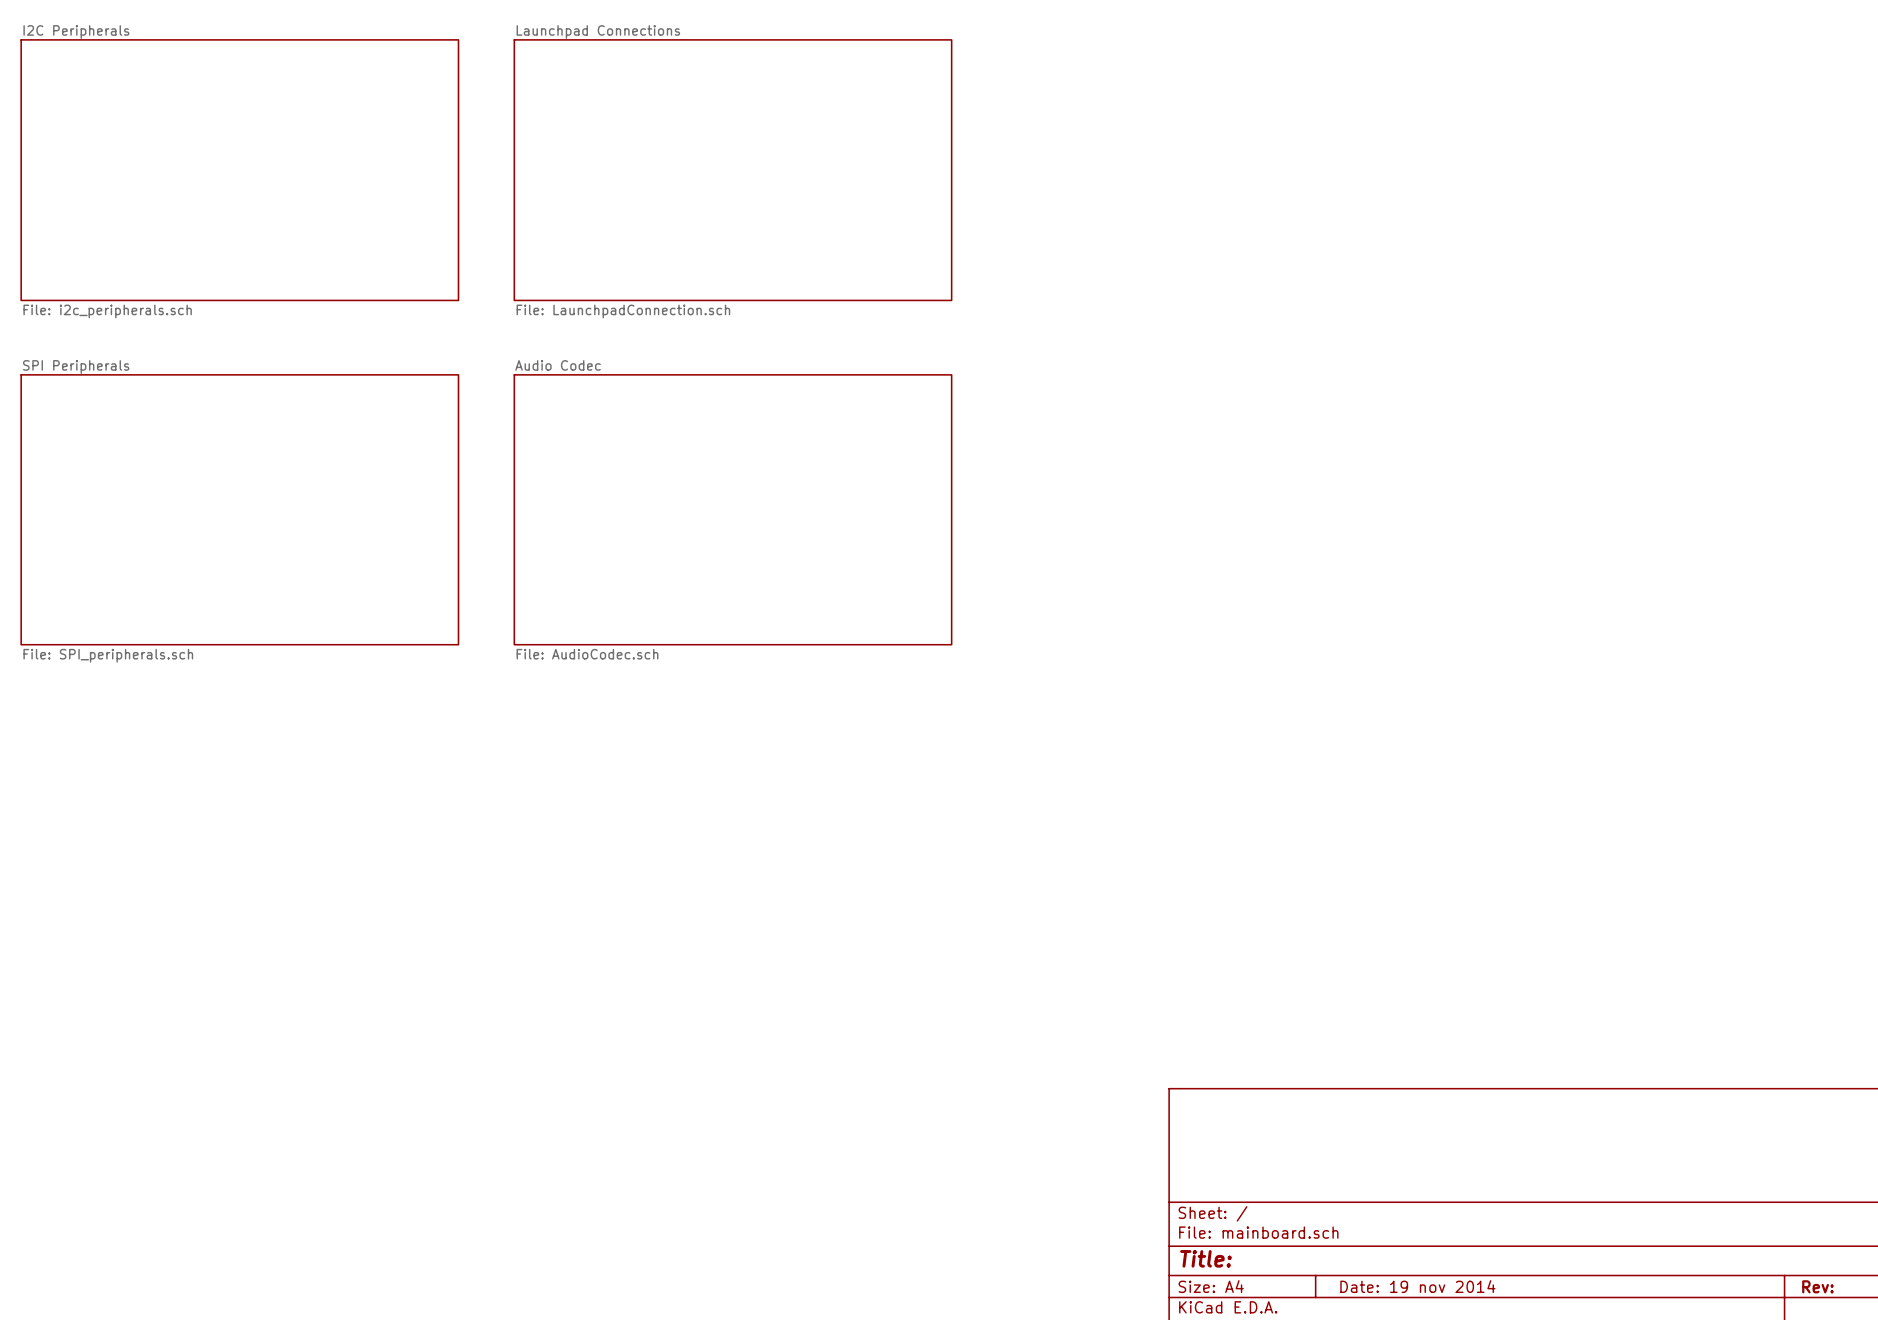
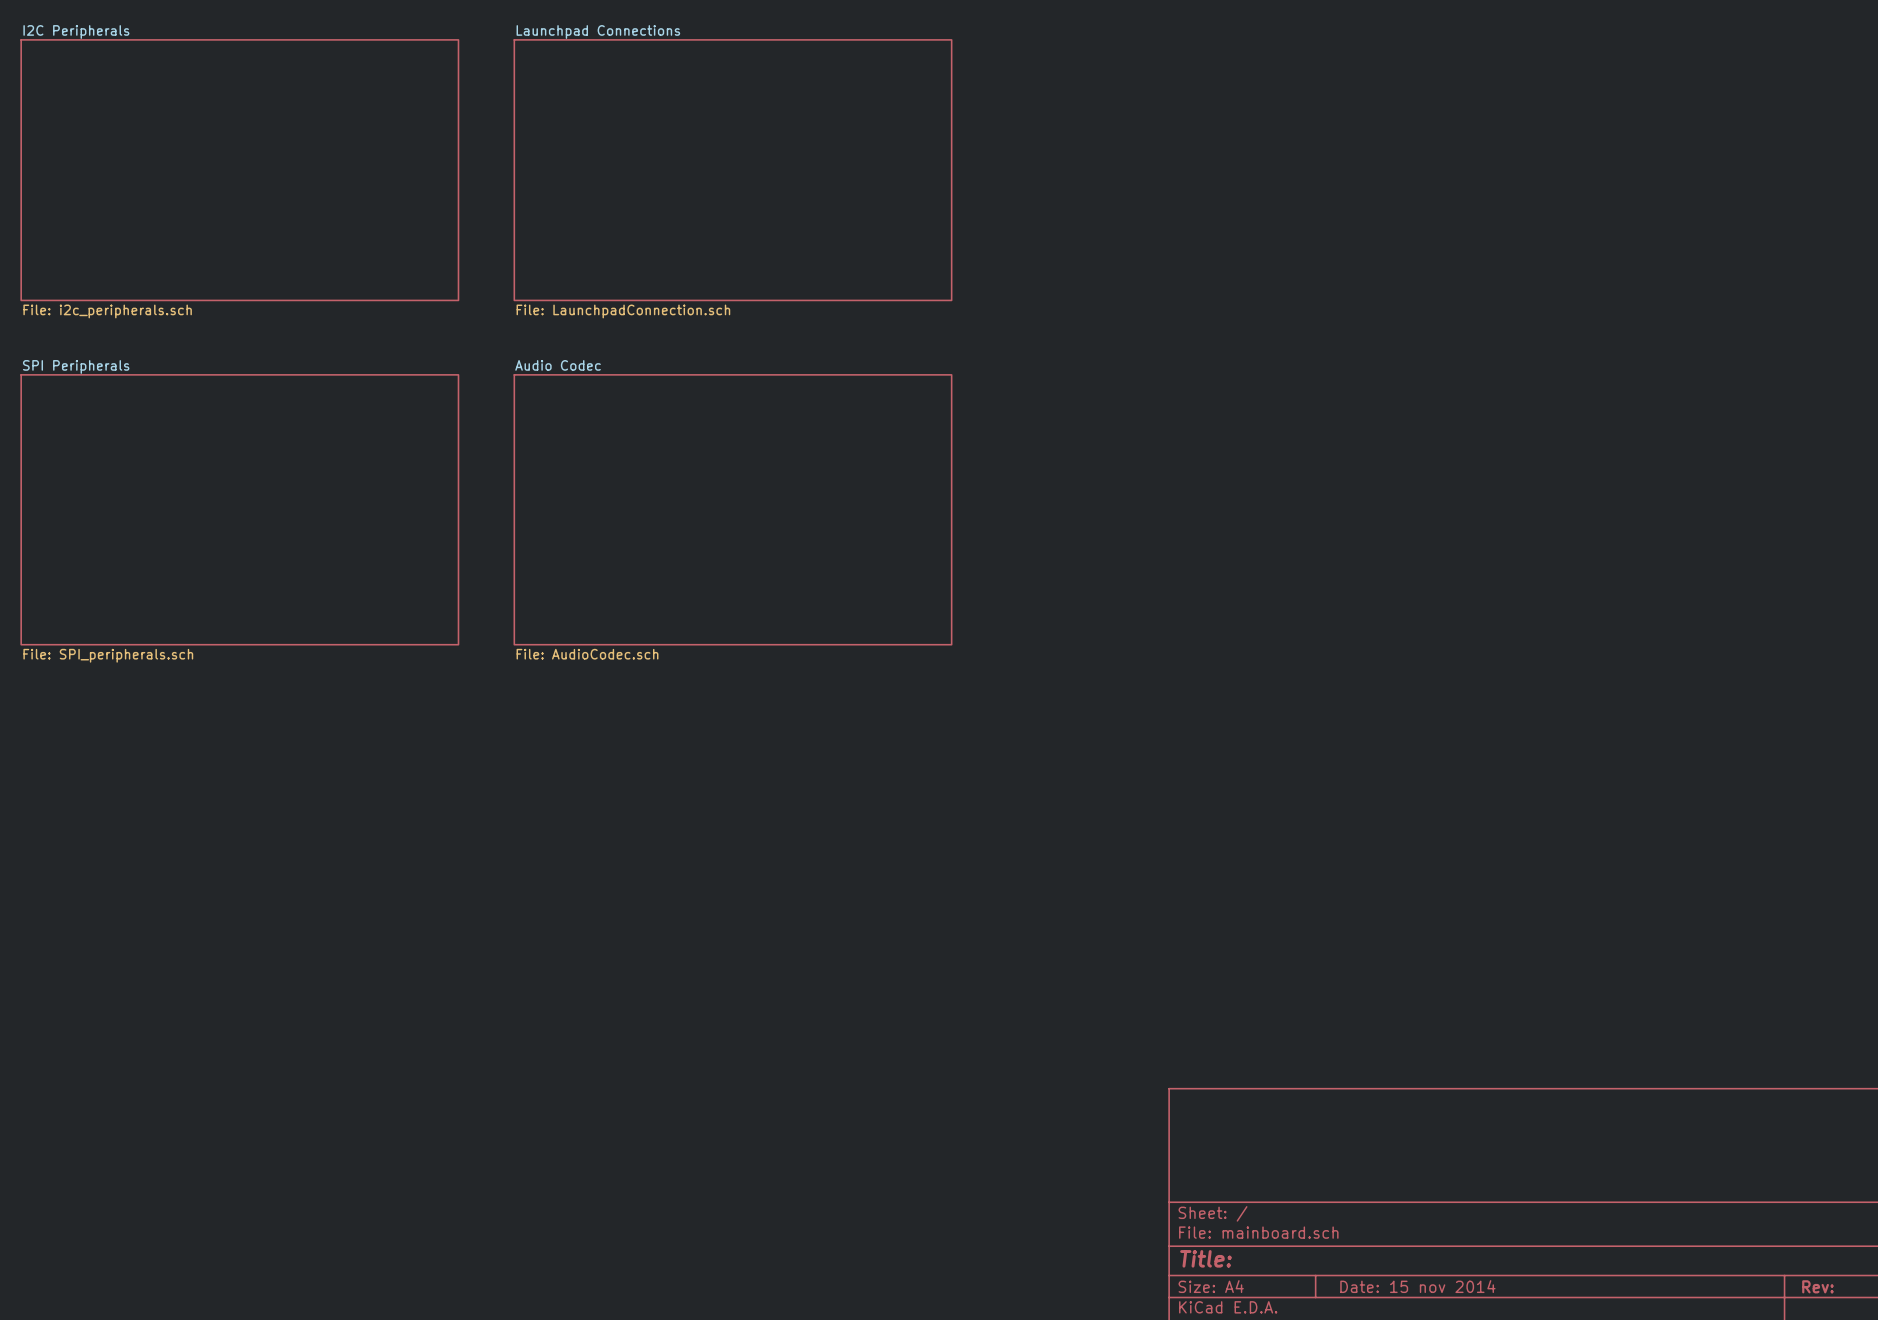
title block: Date: 19 nov 2014 (1417, 1286) -> Date: 15 nov 2014 (1417, 1286)

